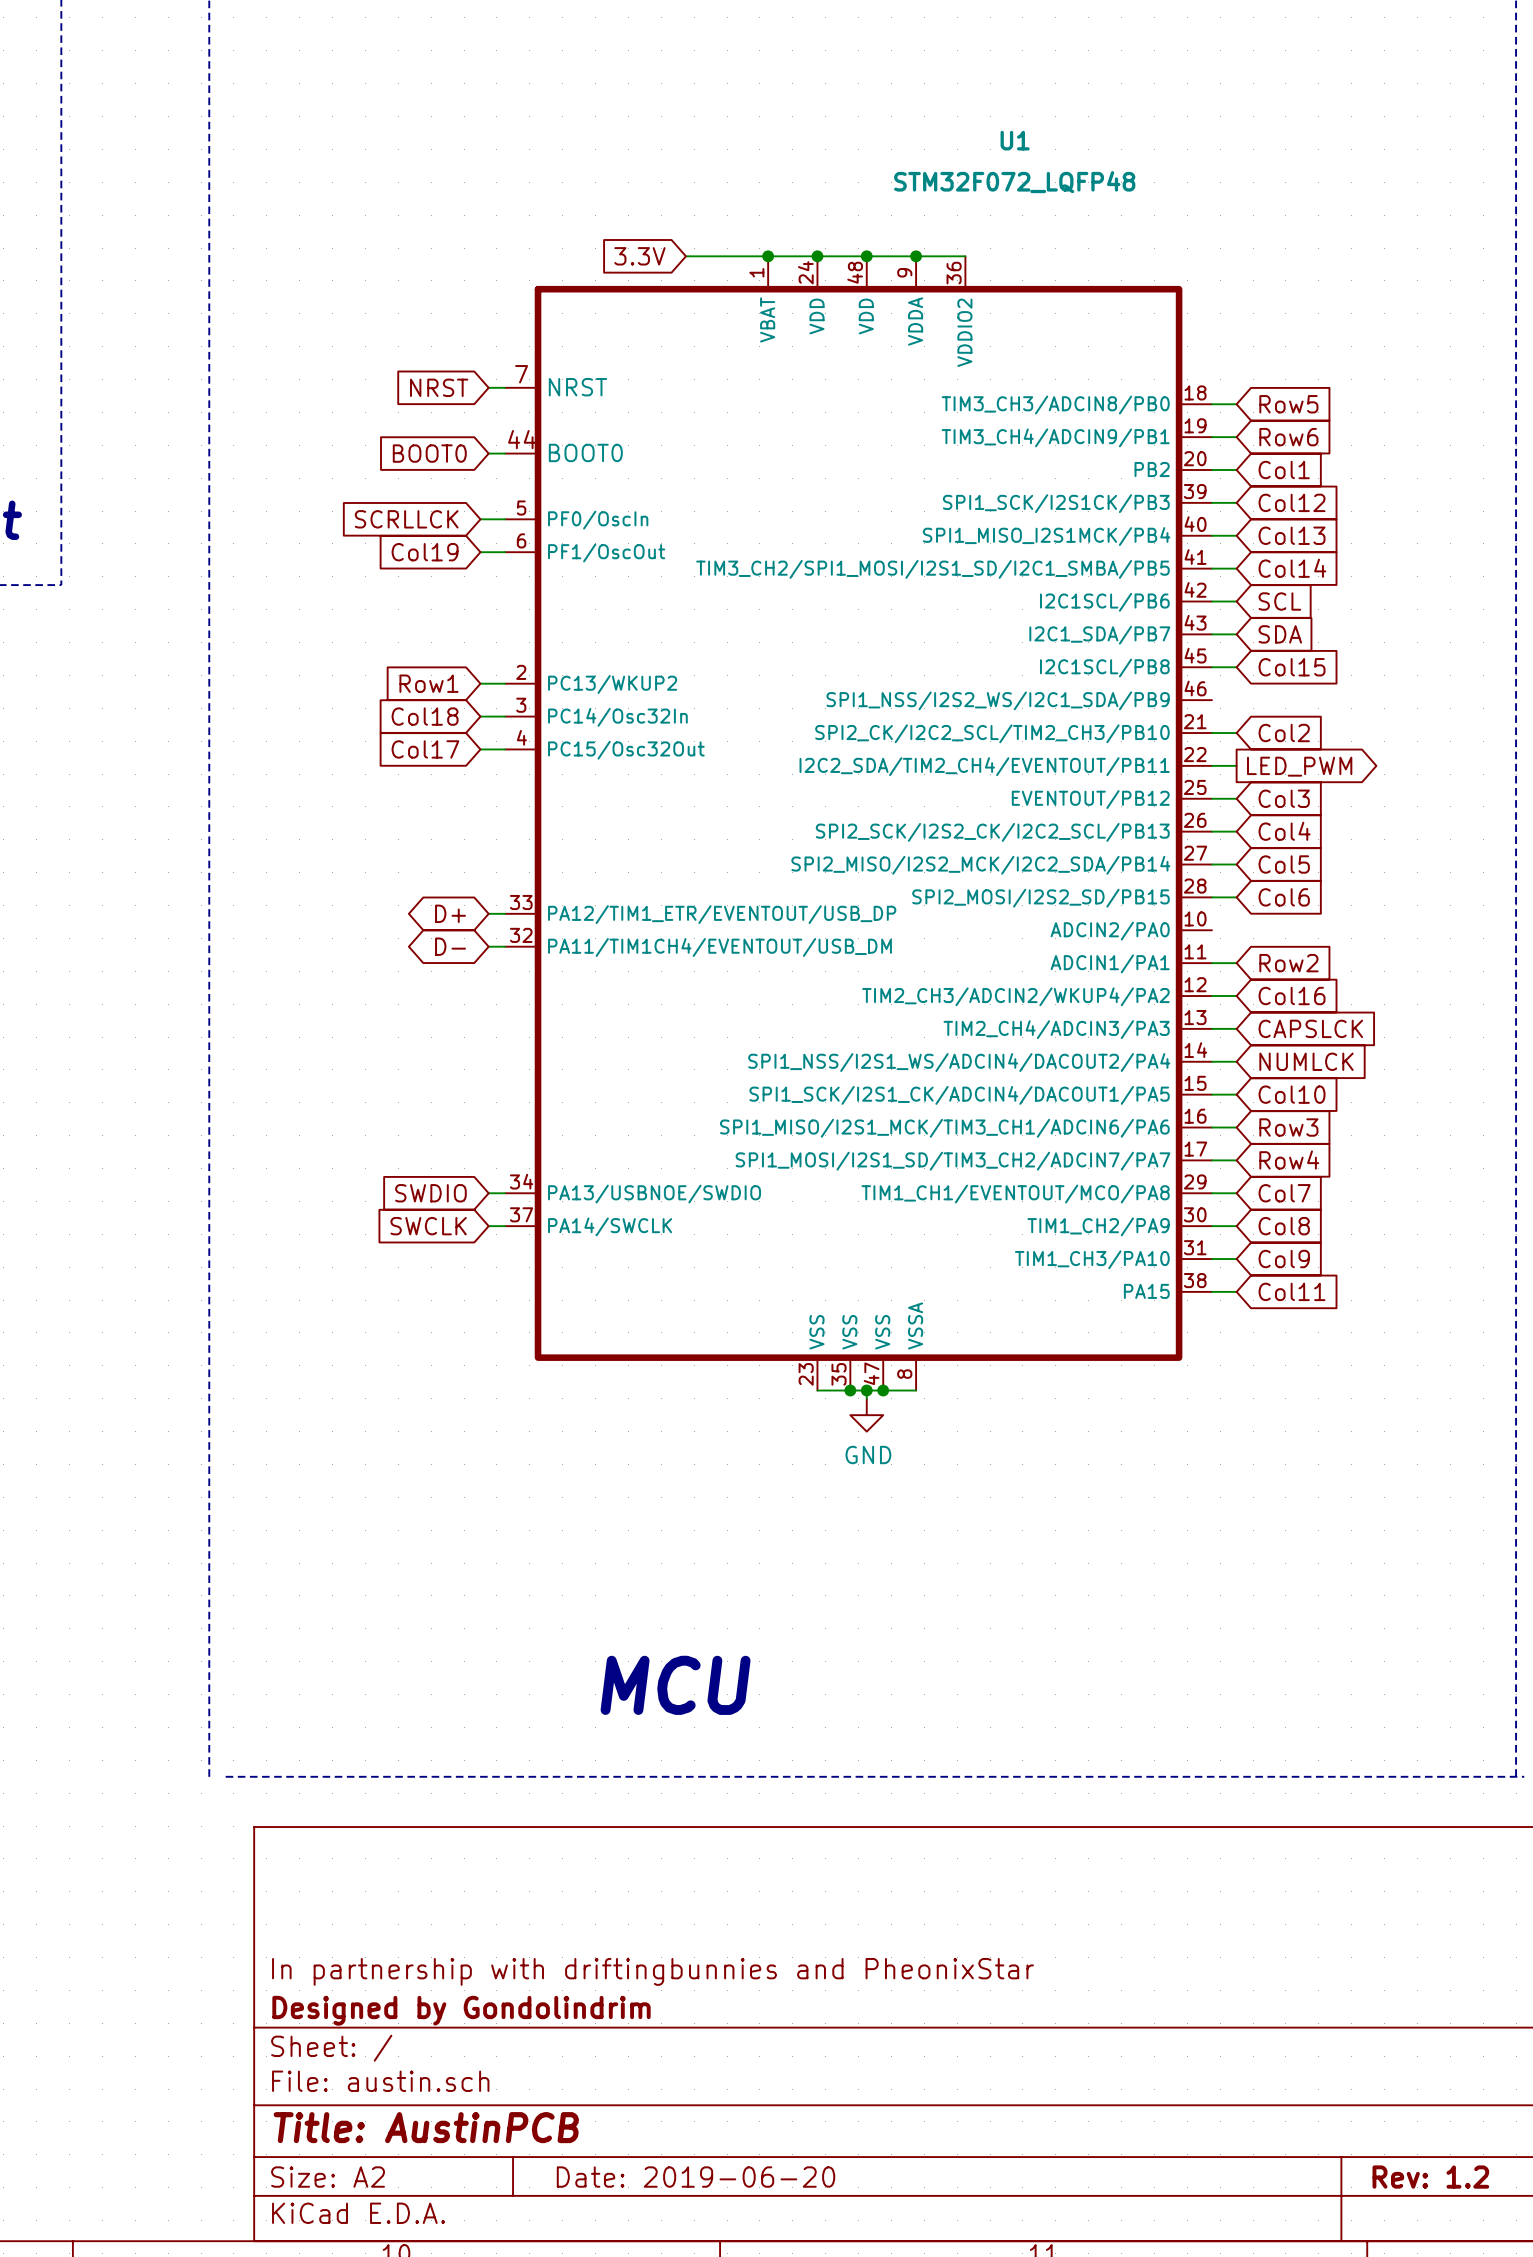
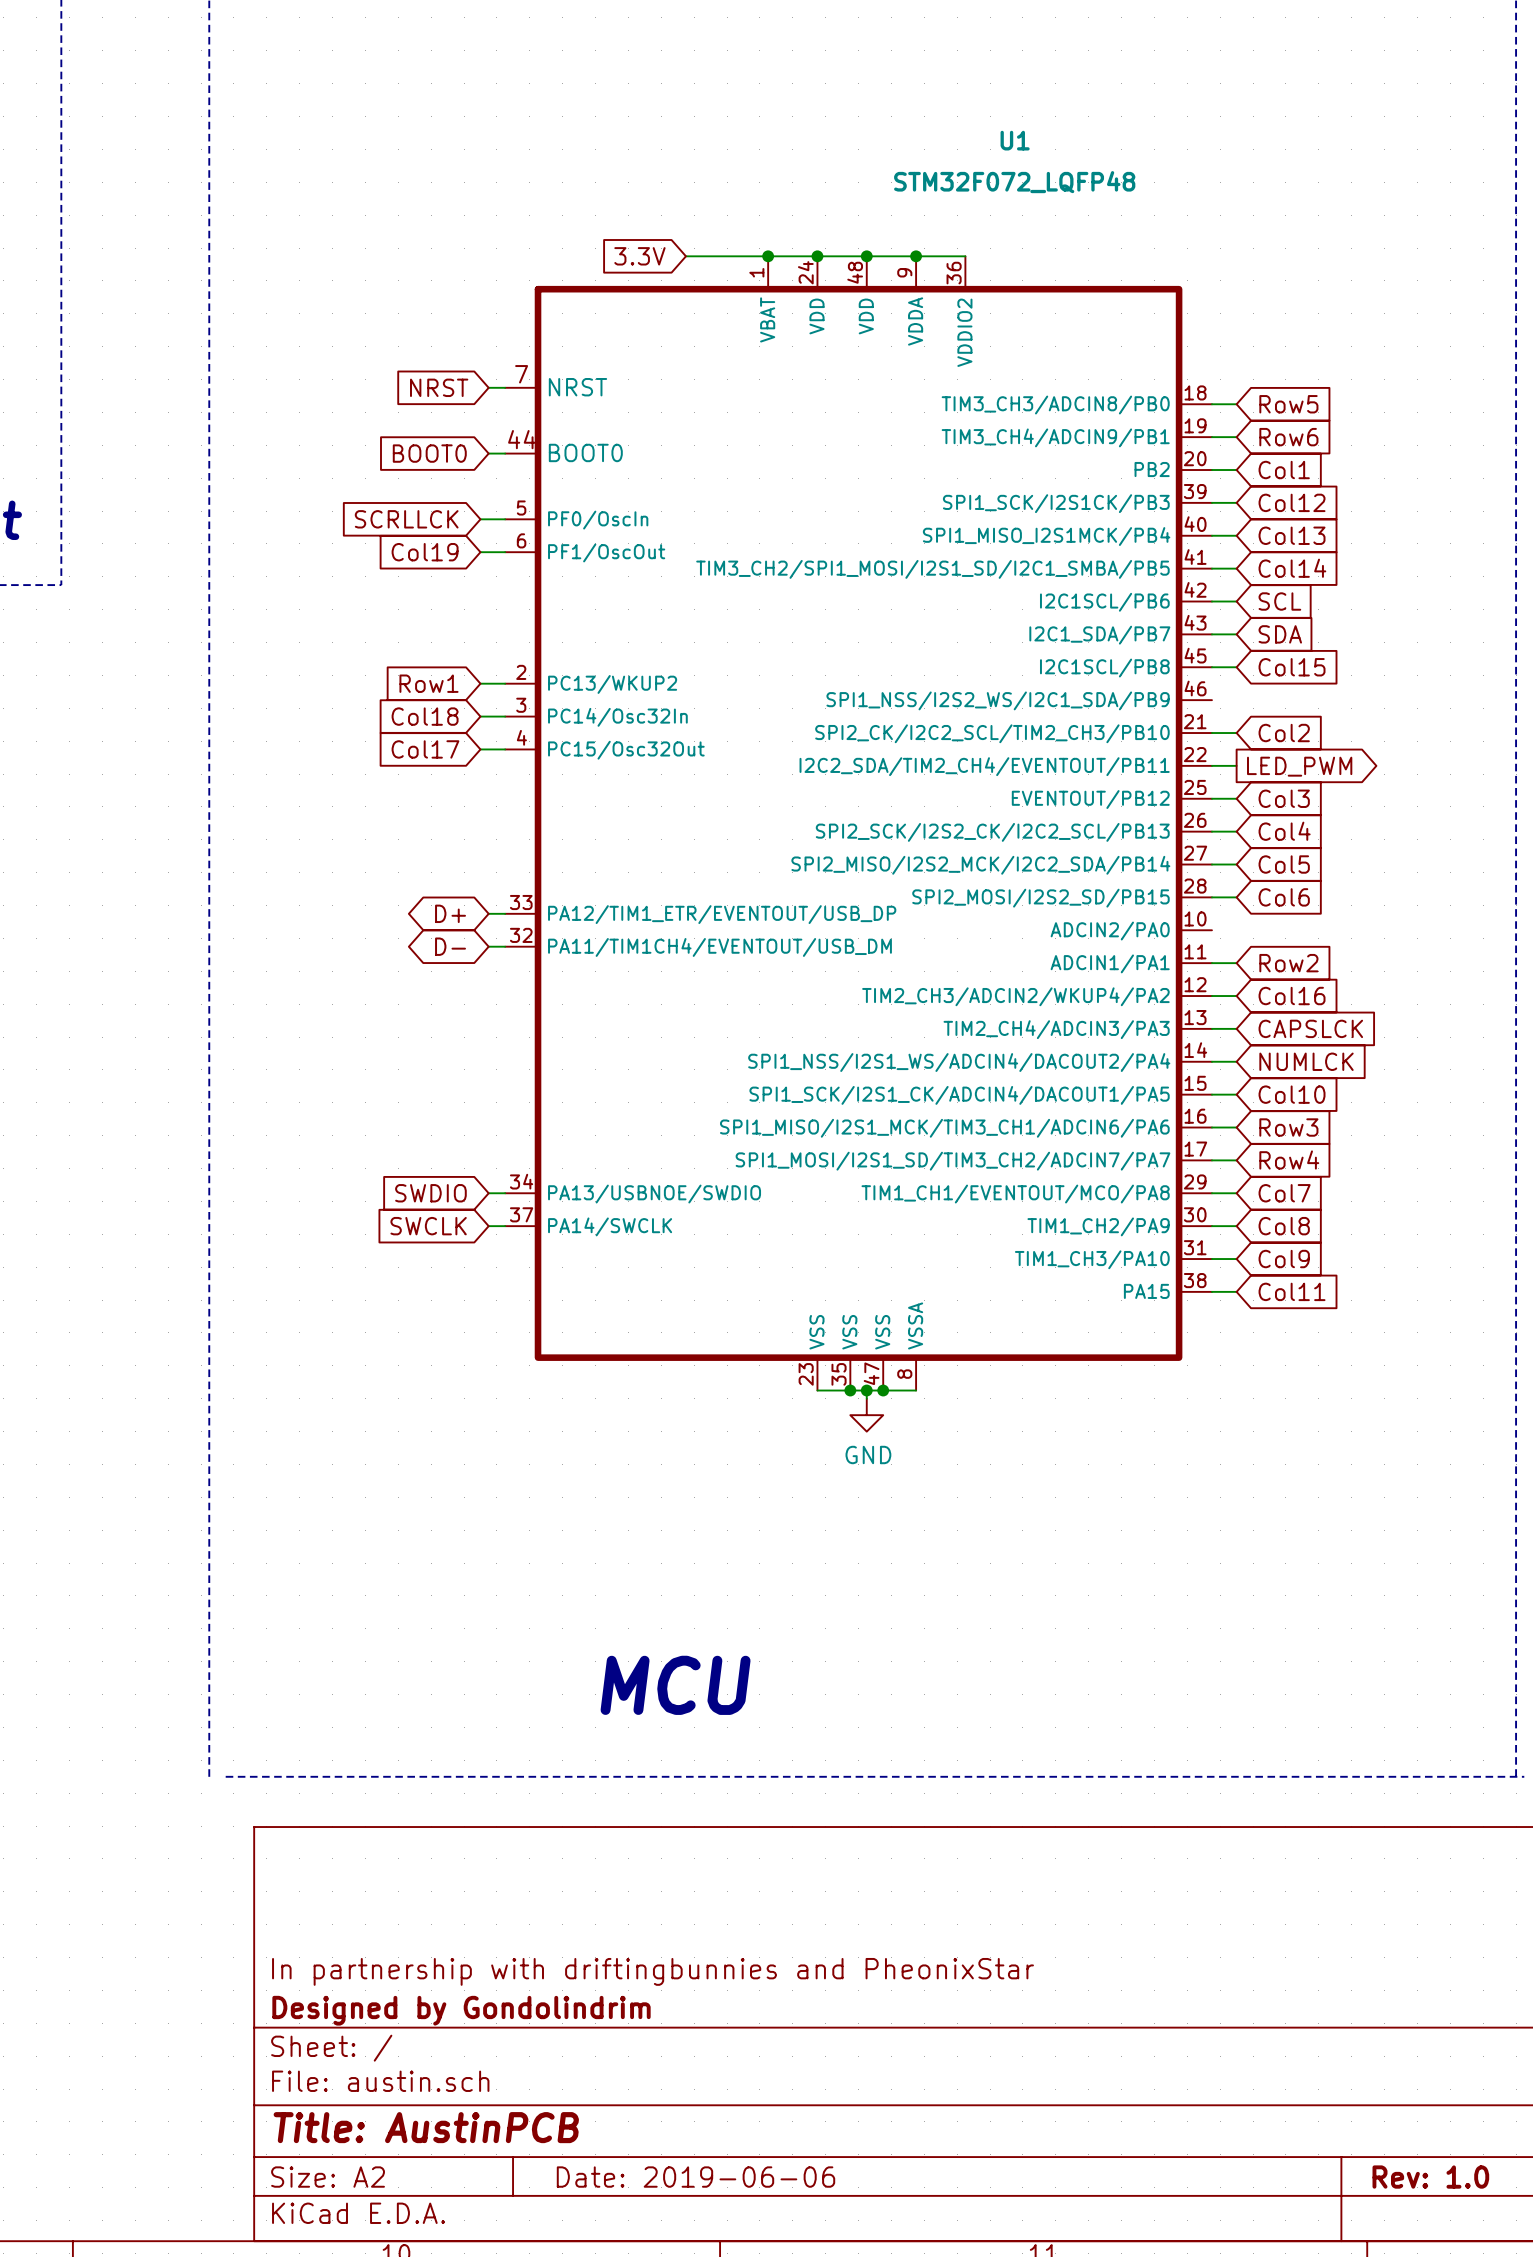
title block: Date: 2019-06-20 (695, 2177) -> Date: 2019-06-06 (695, 2177)
title block: Rev: 1.2 (1430, 2177) -> Rev: 1.0 (1430, 2177)

